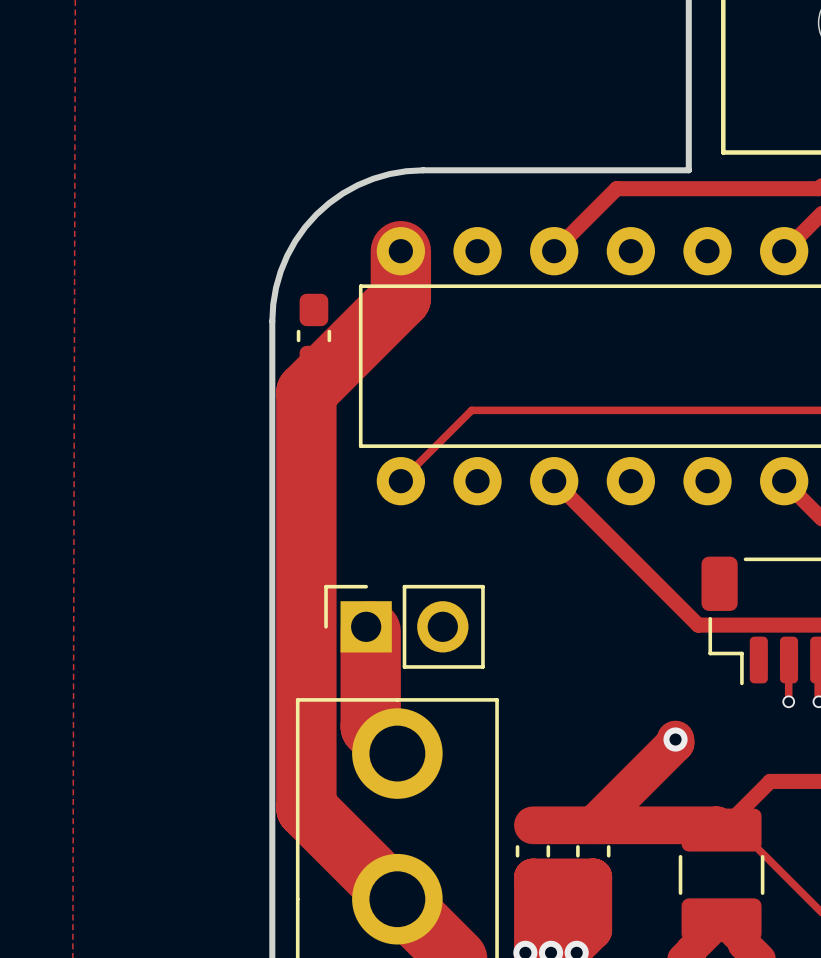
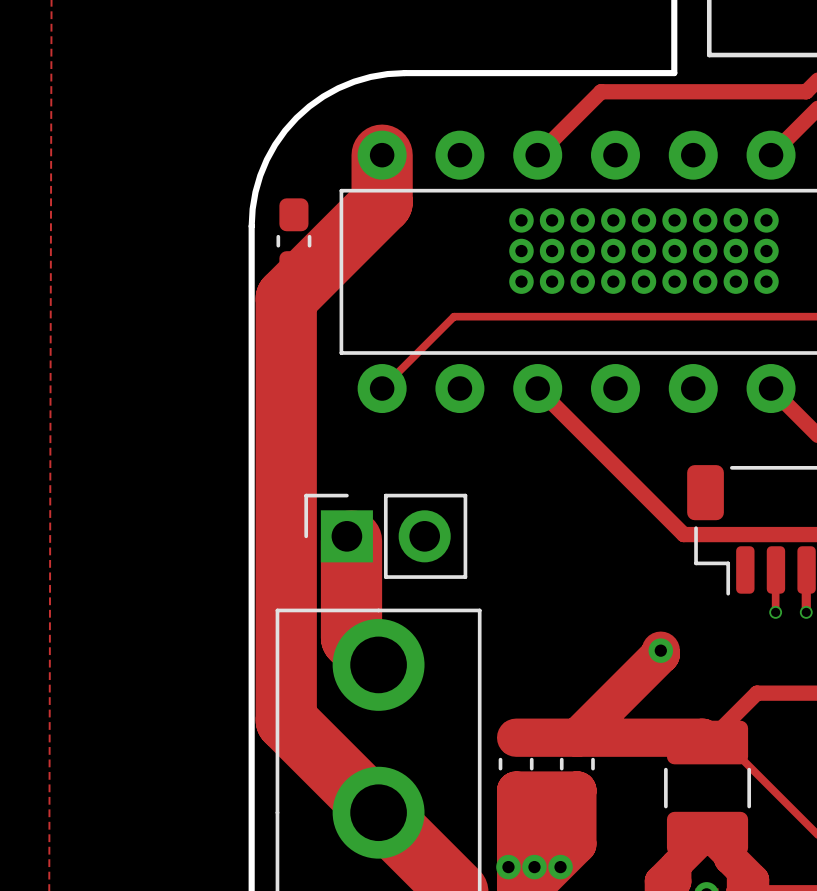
via: none -> (521, 220)
via: none -> (552, 220)
via: none -> (582, 220)
via: none -> (613, 220)
via: none -> (643, 220)
via: none -> (674, 220)
via: none -> (705, 220)
via: none -> (735, 220)
via: none -> (766, 220)
via: none -> (521, 251)
via: none -> (552, 251)
via: none -> (582, 251)
via: none -> (613, 251)
via: none -> (643, 251)
via: none -> (674, 251)
via: none -> (705, 251)
via: none -> (735, 251)
via: none -> (766, 251)
via: none -> (521, 281)
via: none -> (552, 281)
via: none -> (582, 281)
via: none -> (613, 281)
via: none -> (643, 281)
via: none -> (674, 281)
via: none -> (705, 281)
via: none -> (735, 281)
via: none -> (766, 281)

